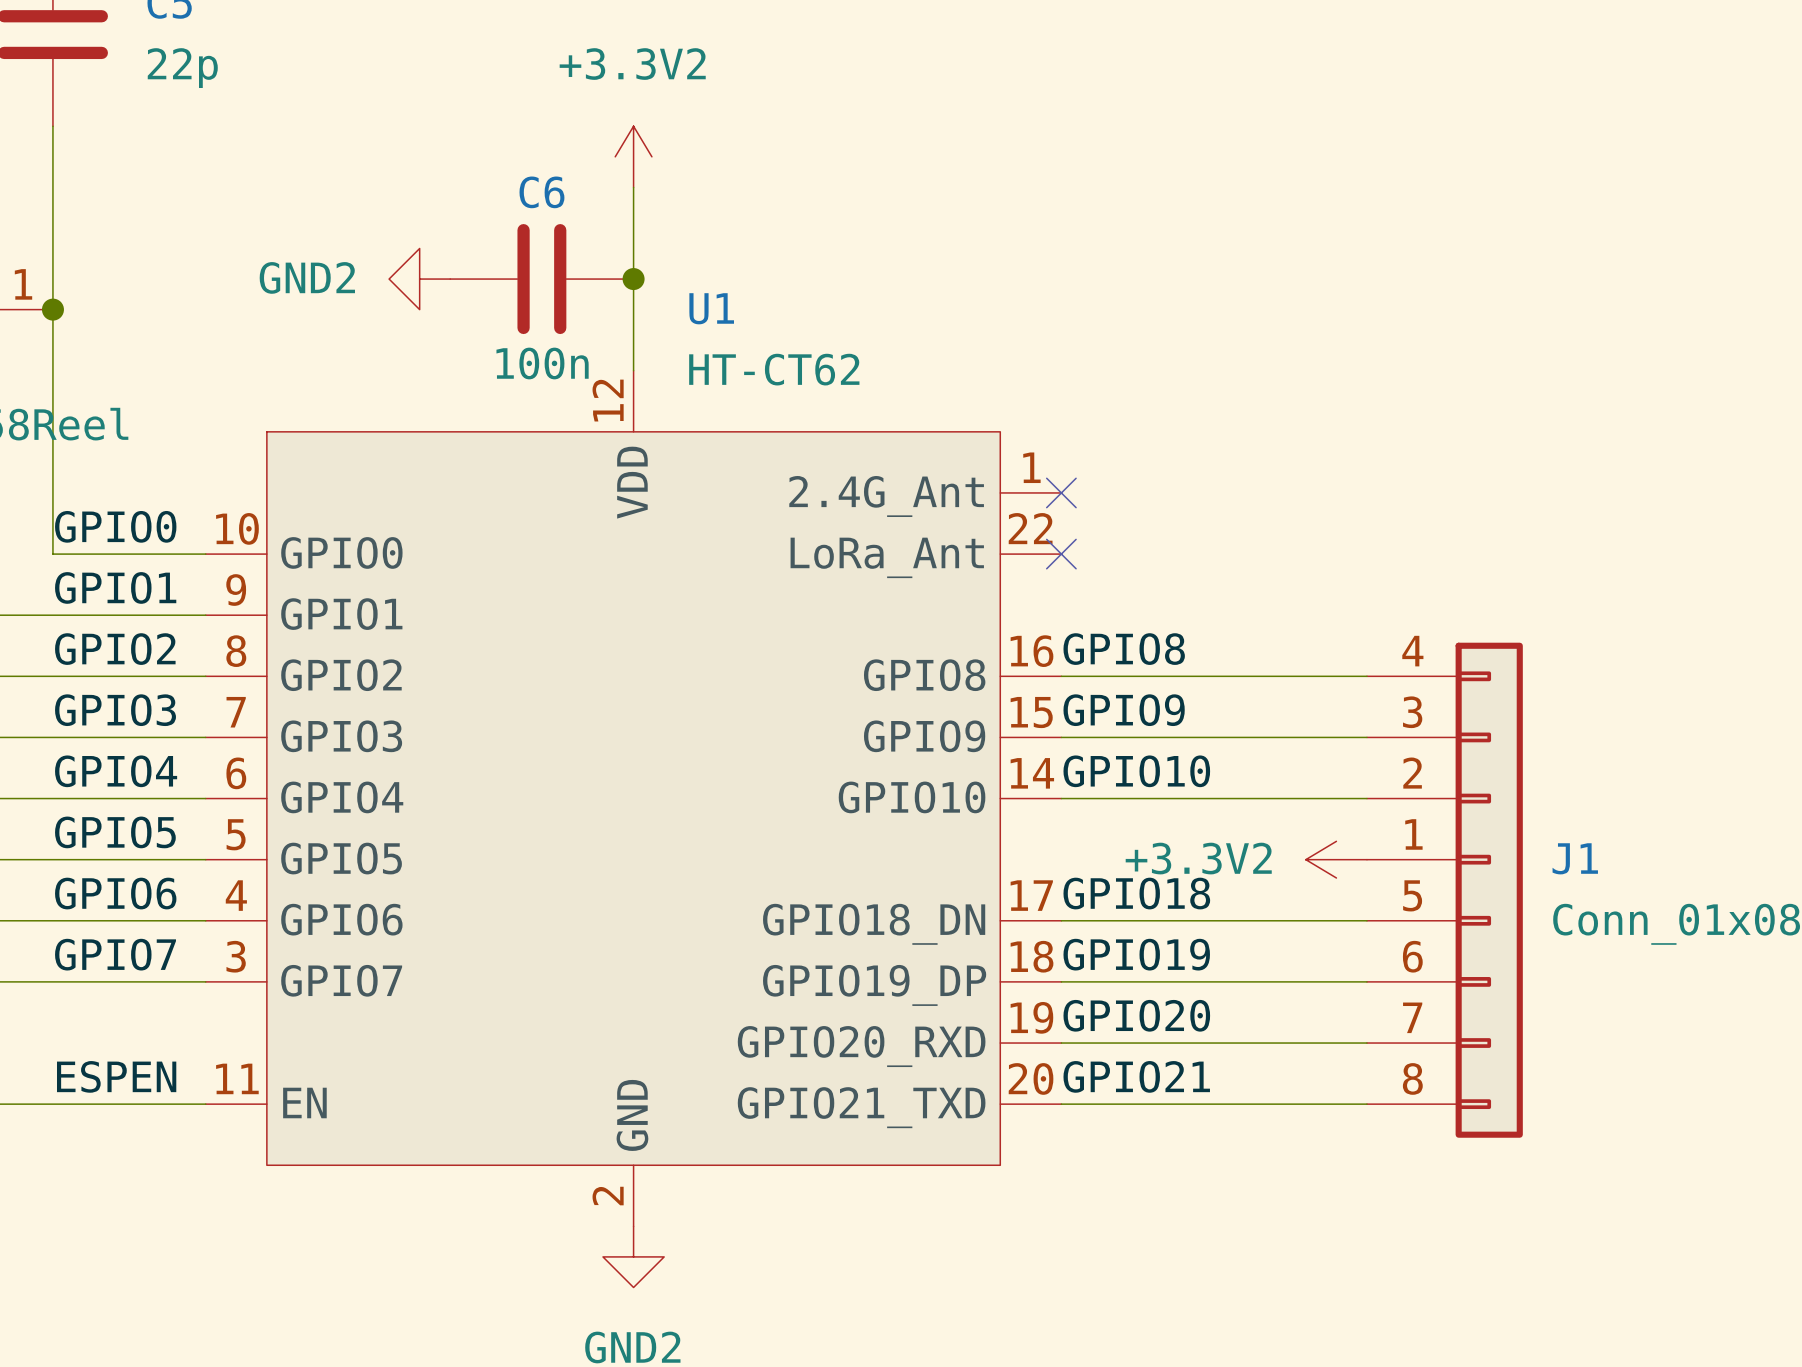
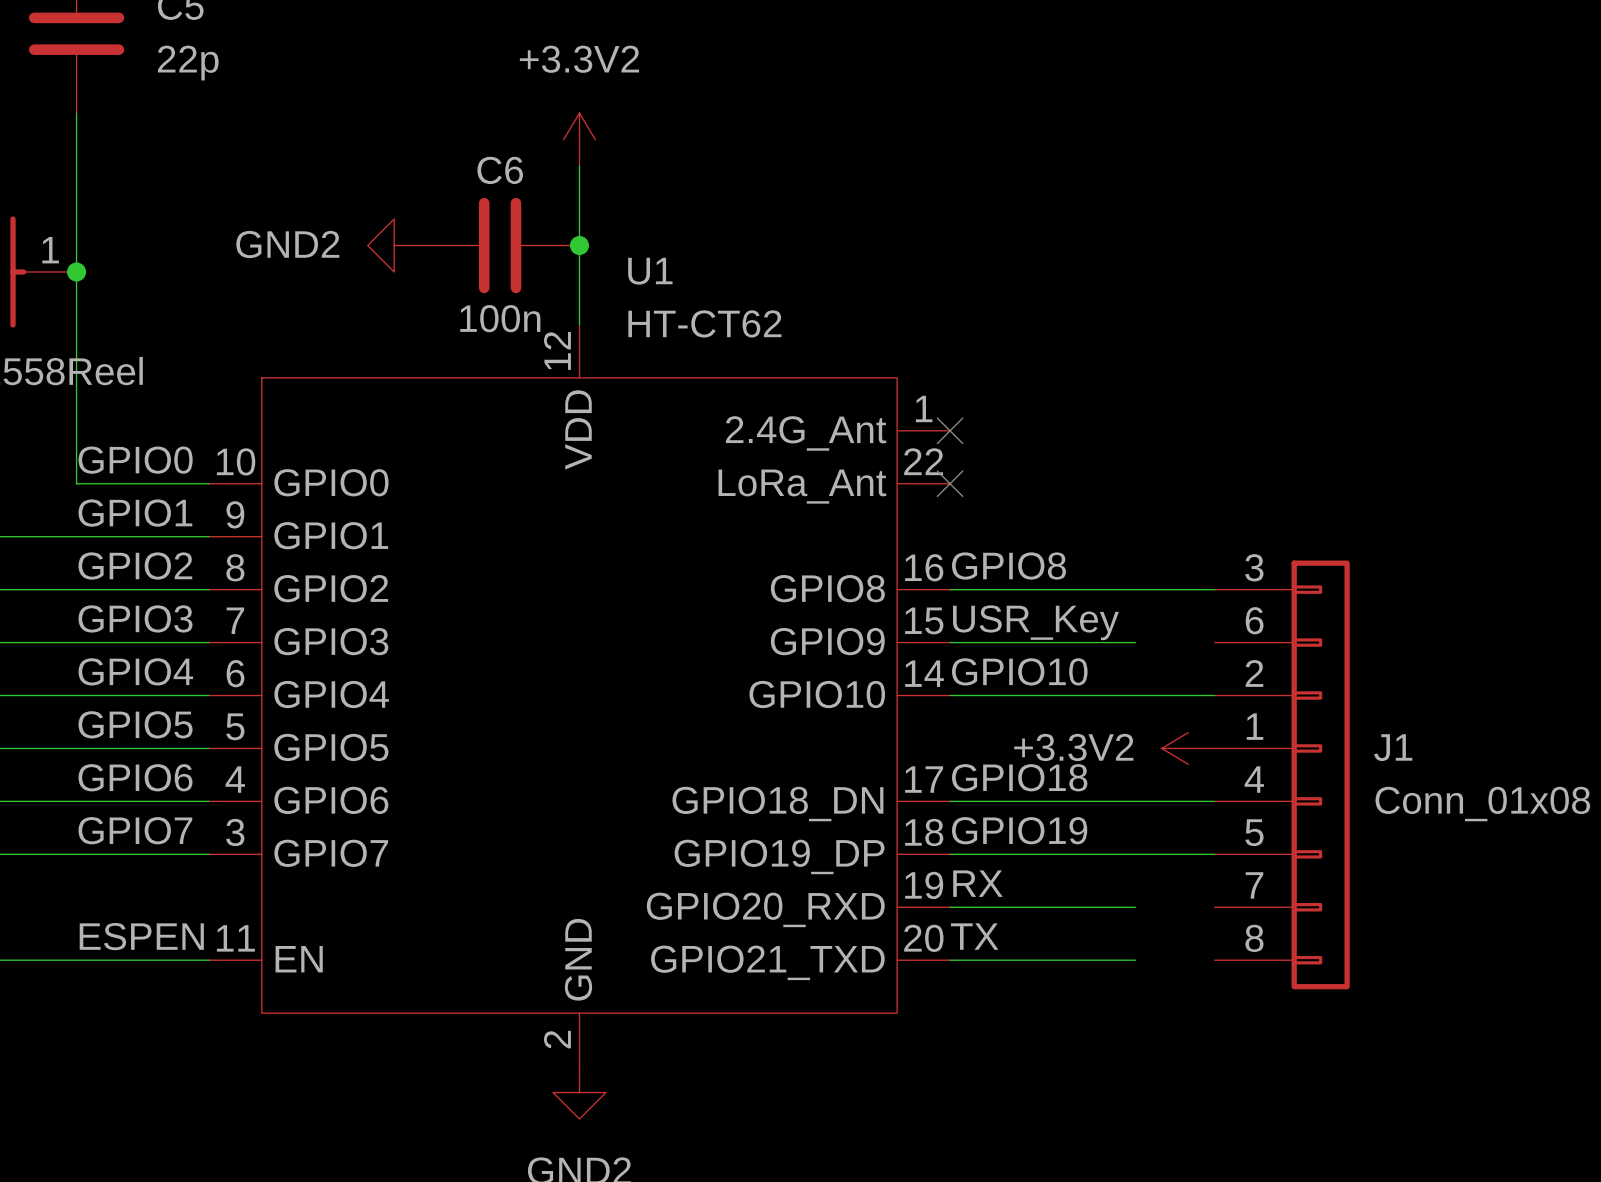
J1 pin number: 4 (1412, 651) -> 3 (1254, 567)
label: GPIO9 (1124, 710) -> USR_Key (1035, 622)
J1 pin number: 3 (1412, 712) -> 6 (1254, 620)
wire: (1275, 737) (1366, 737) -> none
J1 pin number: 5 (1412, 895) -> 4 (1254, 779)
J1 pin number: 6 (1412, 956) -> 5 (1254, 832)
label: GPIO20 (1136, 1015) -> RX (977, 883)
wire: (1275, 1043) (1366, 1043) -> none
label: GPIO21 (1136, 1076) -> TX (974, 936)
wire: (1275, 1104) (1366, 1104) -> none

